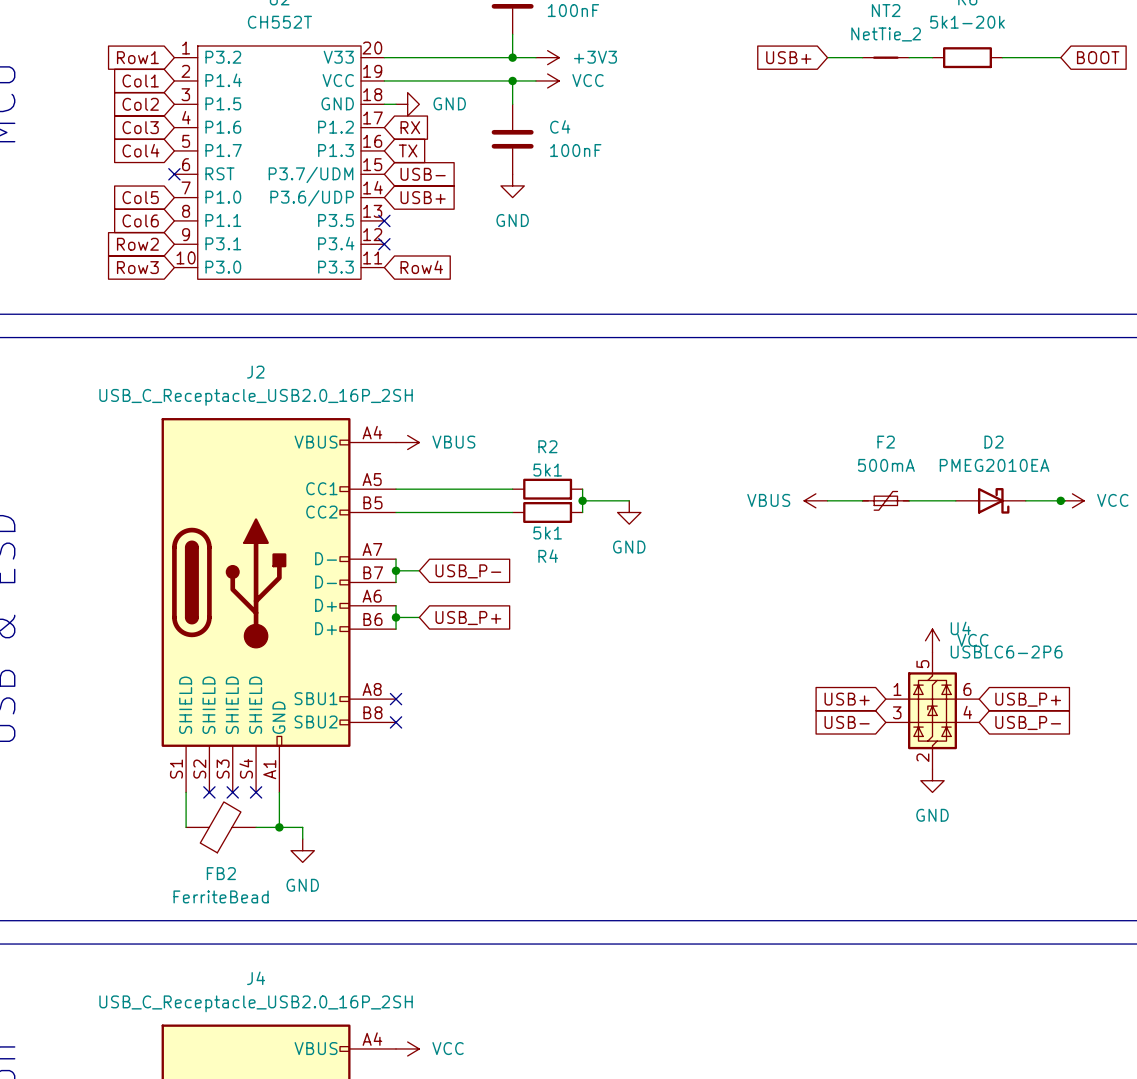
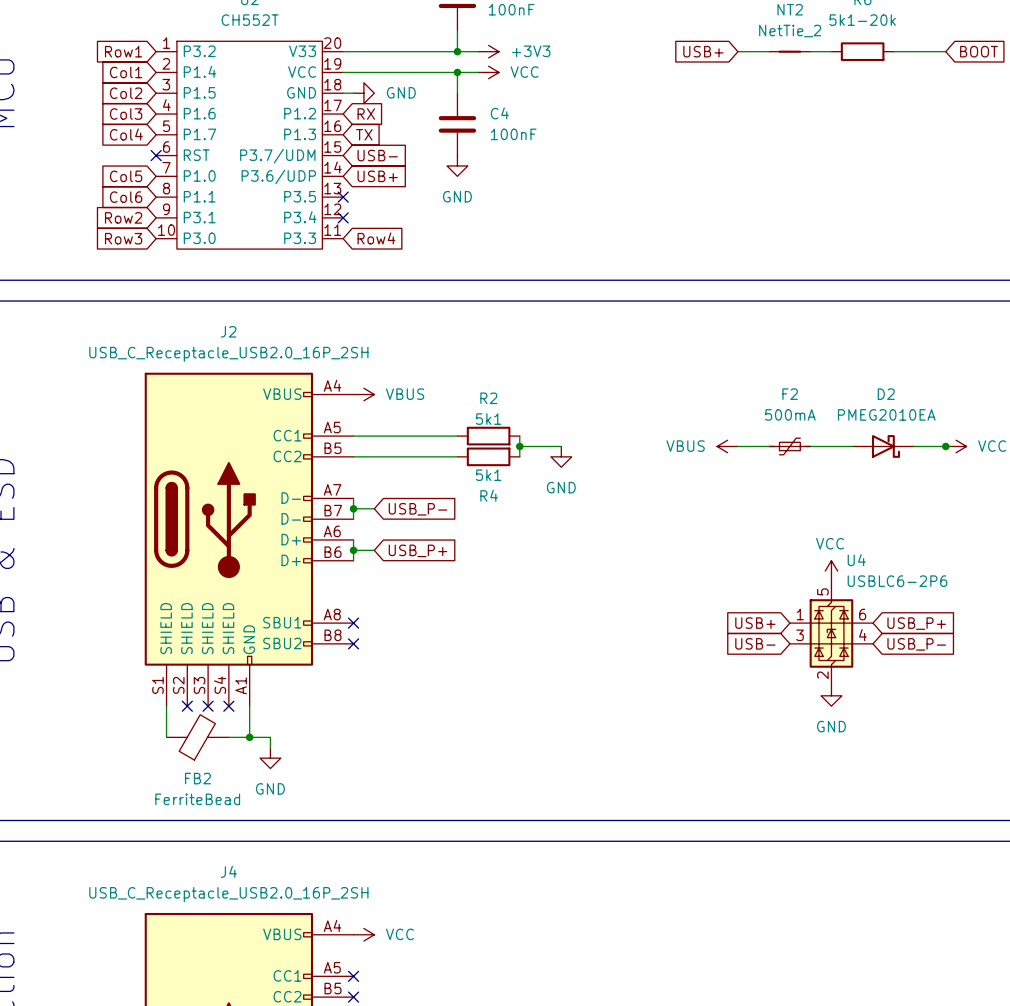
power symbol text position: VCC (972, 640) -> VCC (830, 543)

